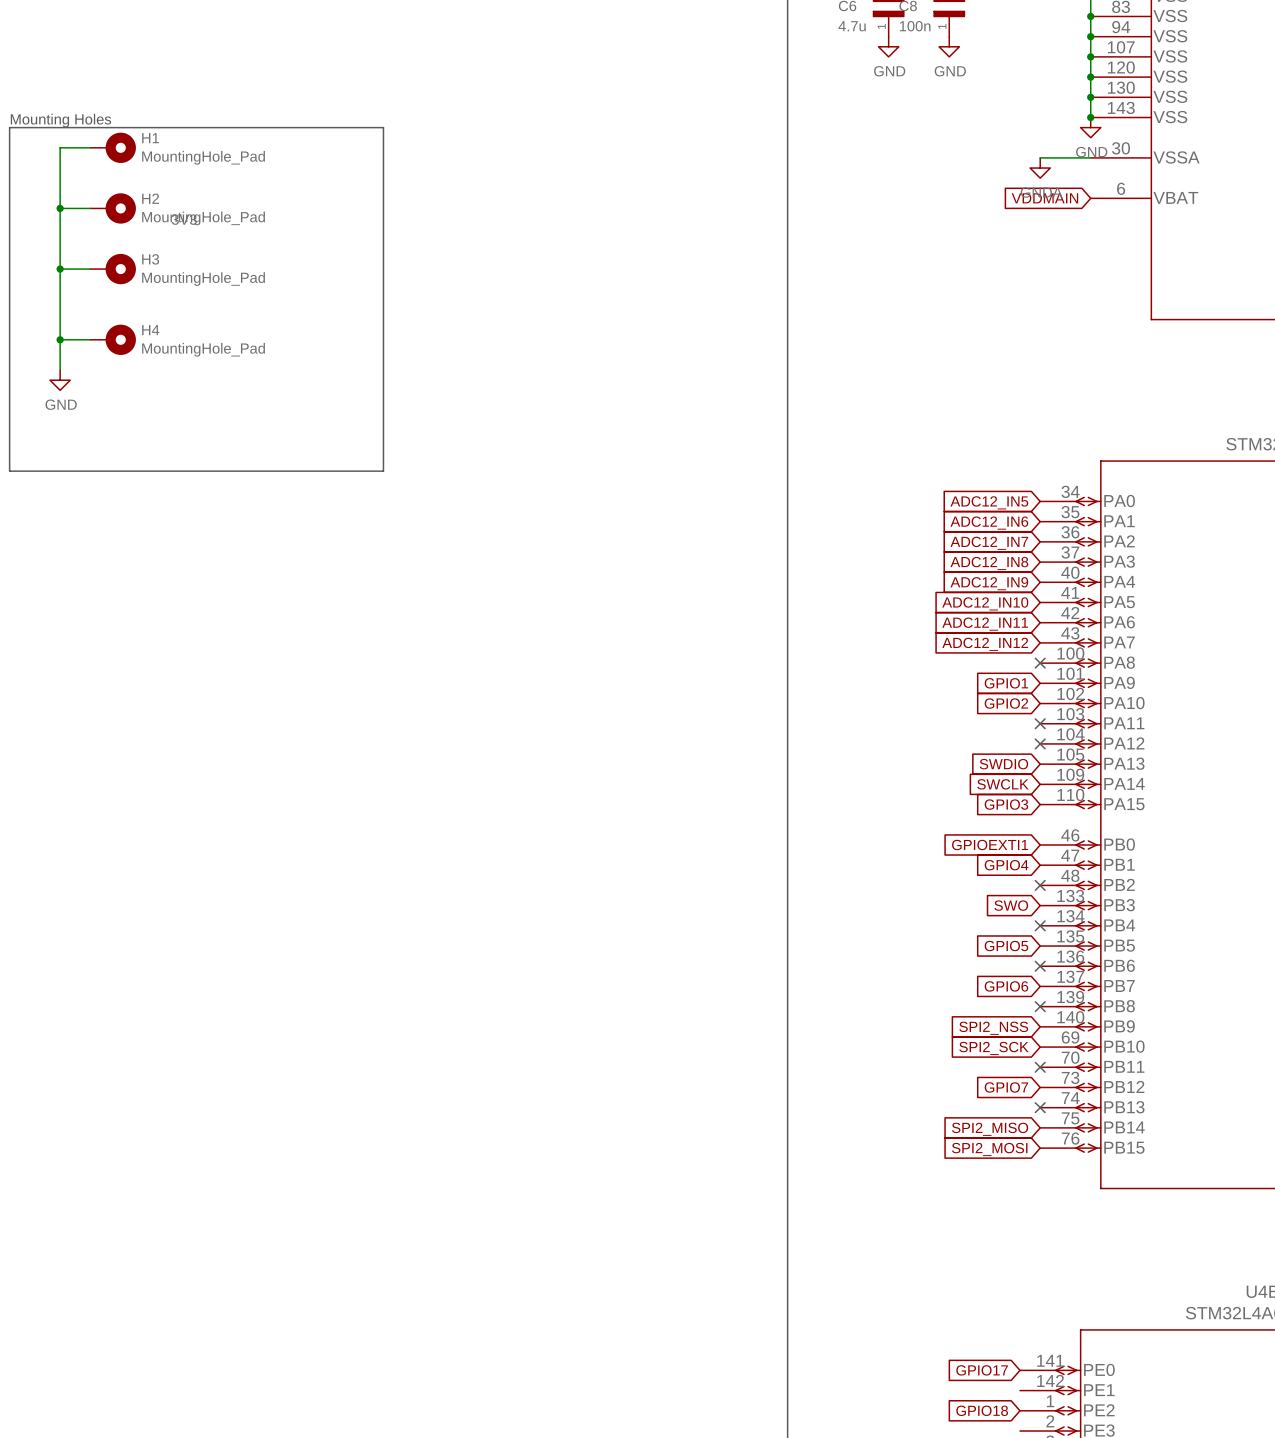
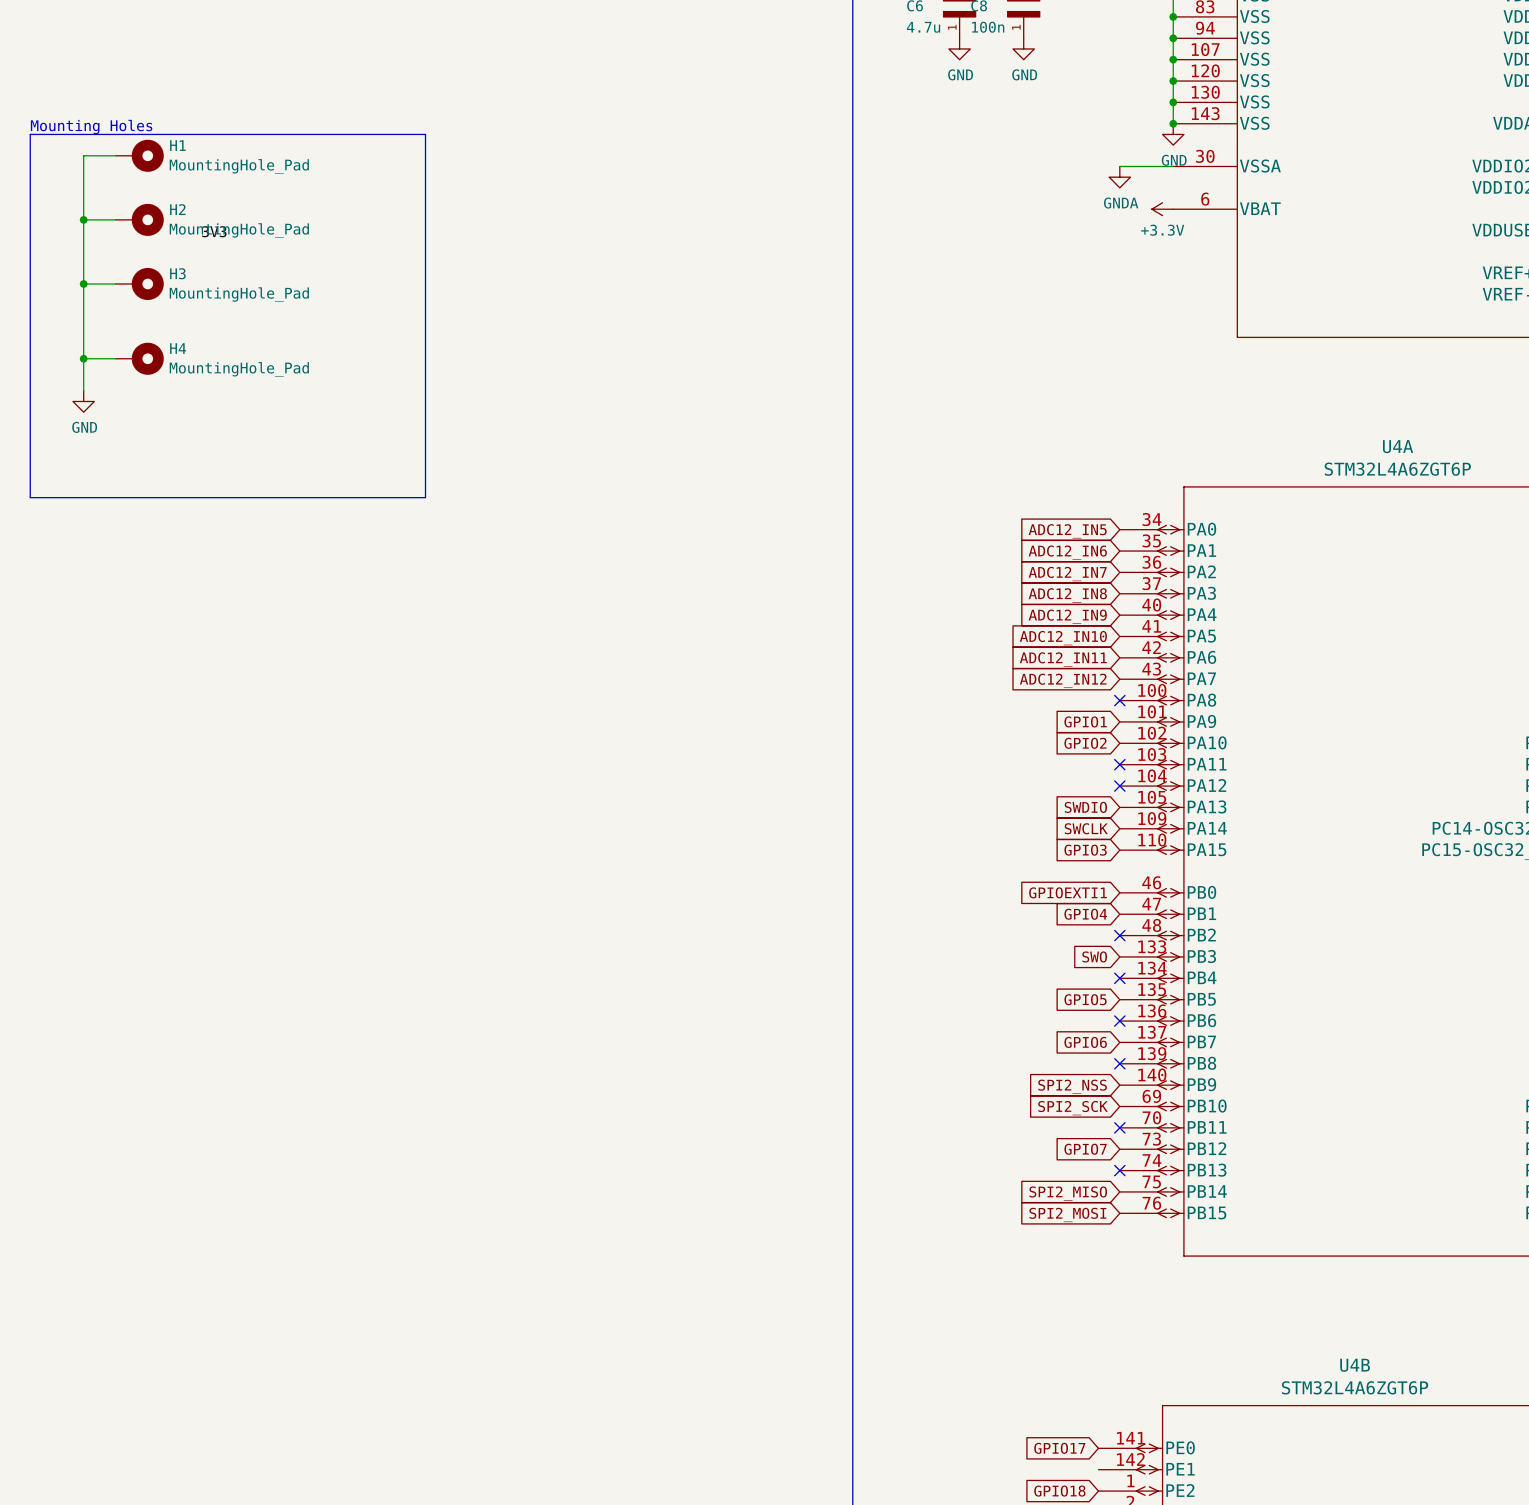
global label: VDDMAIN (1044, 198) -> none
power symbol: none -> +3.3V (1162, 209)

